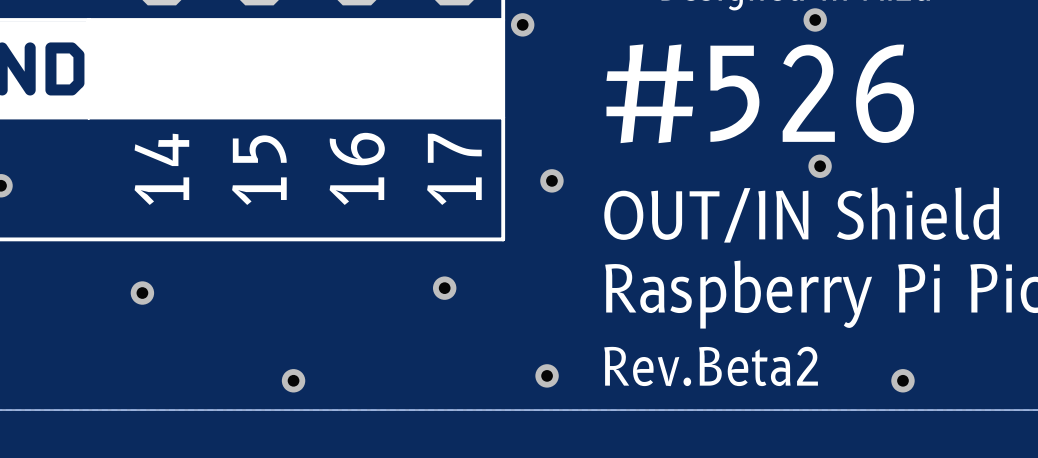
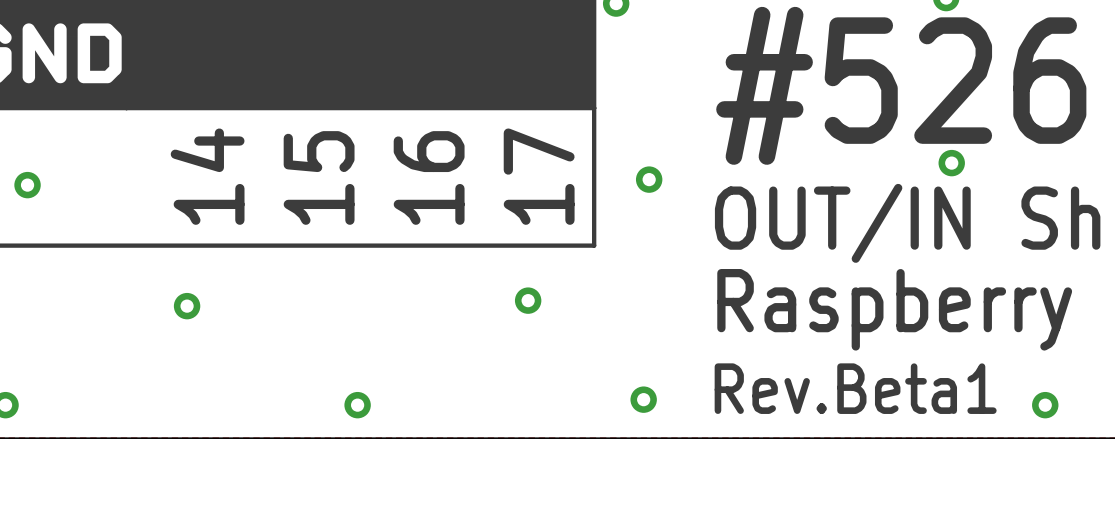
text: Rev.Beta2 (711, 366) -> Rev.Beta1 (855, 388)

